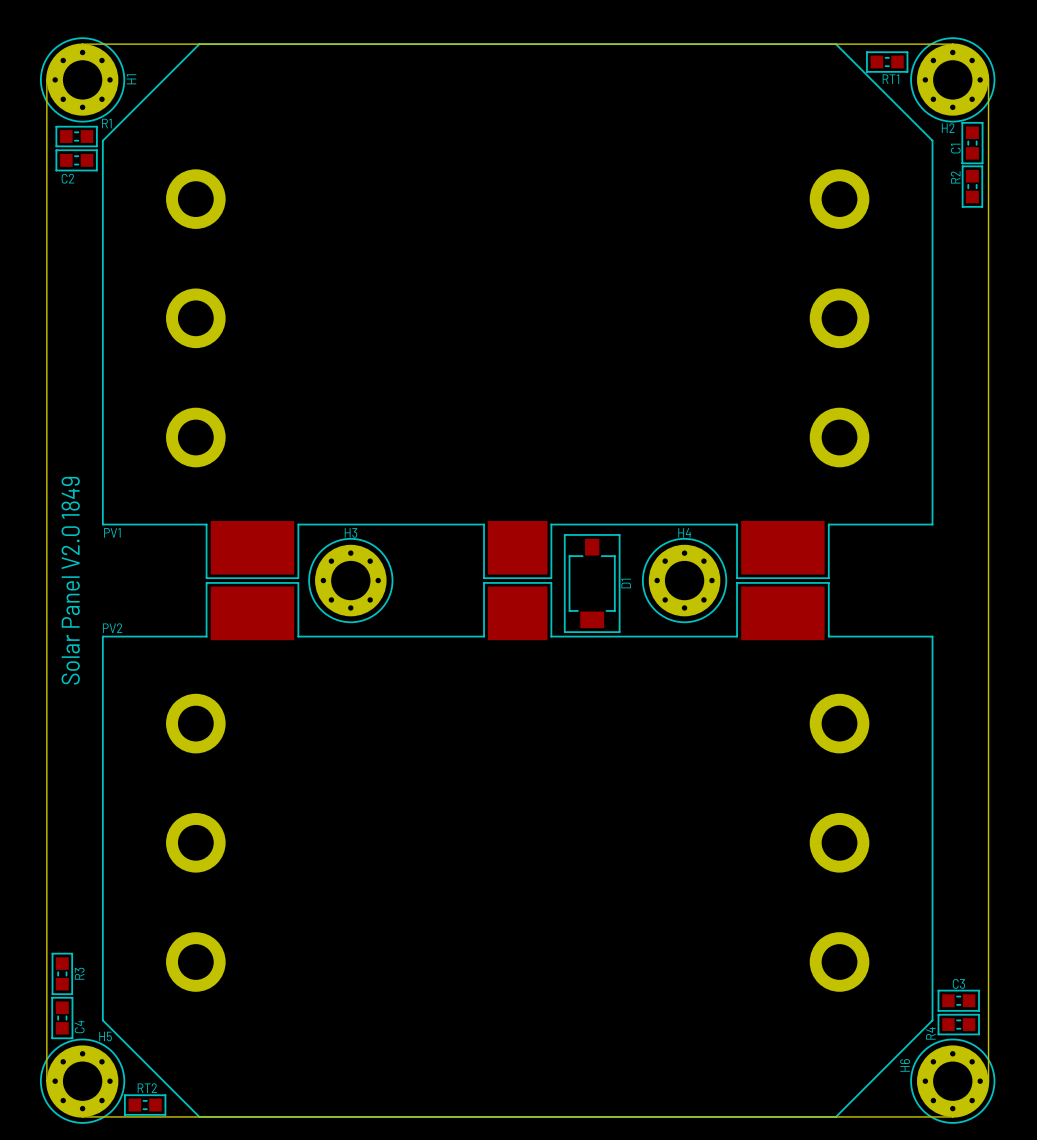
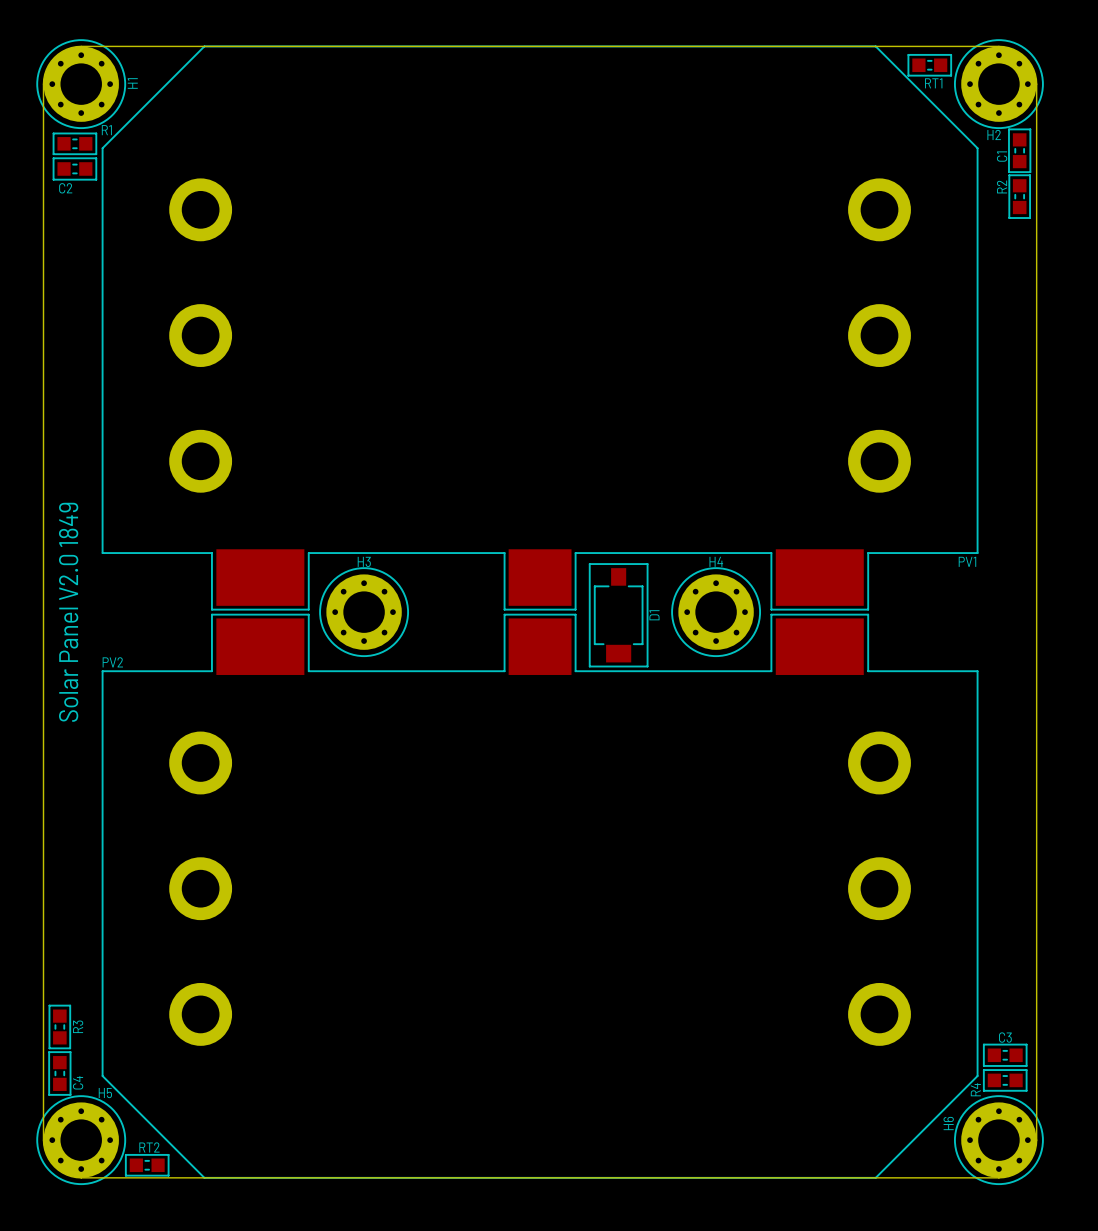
PV1 name position: PV1 (112, 532) -> PV1 (967, 561)

